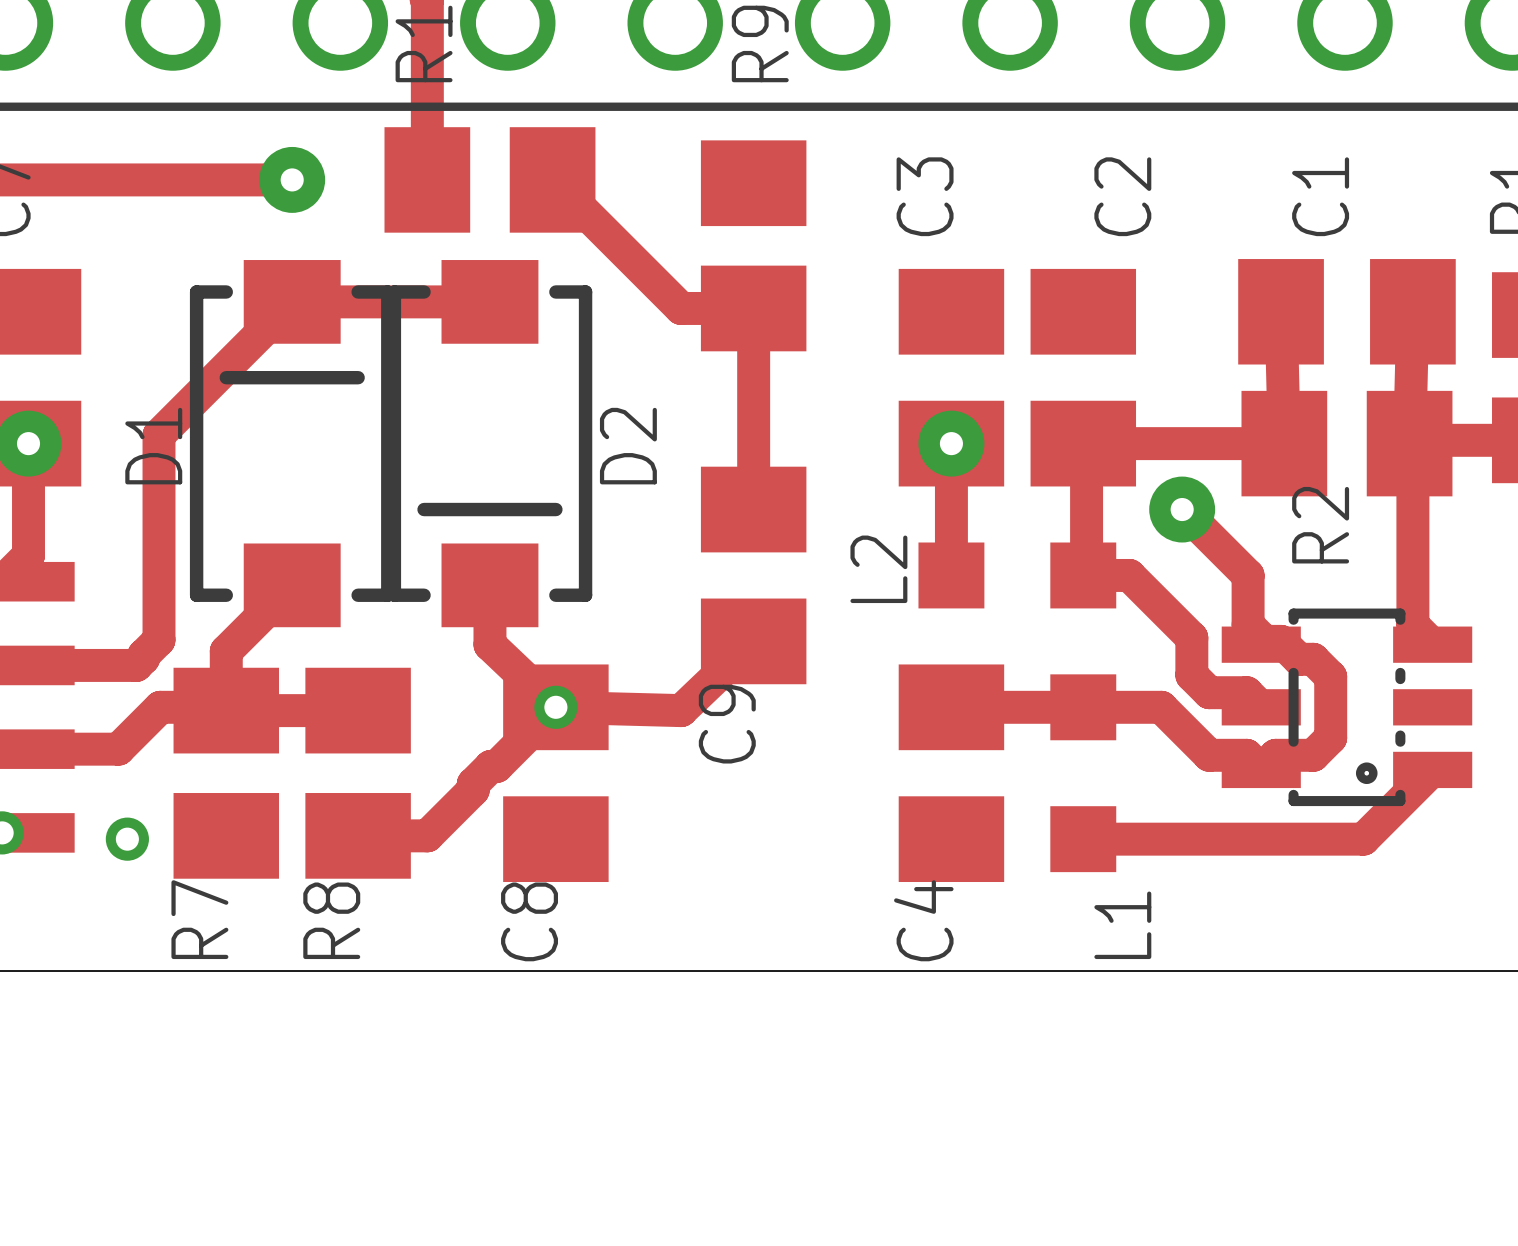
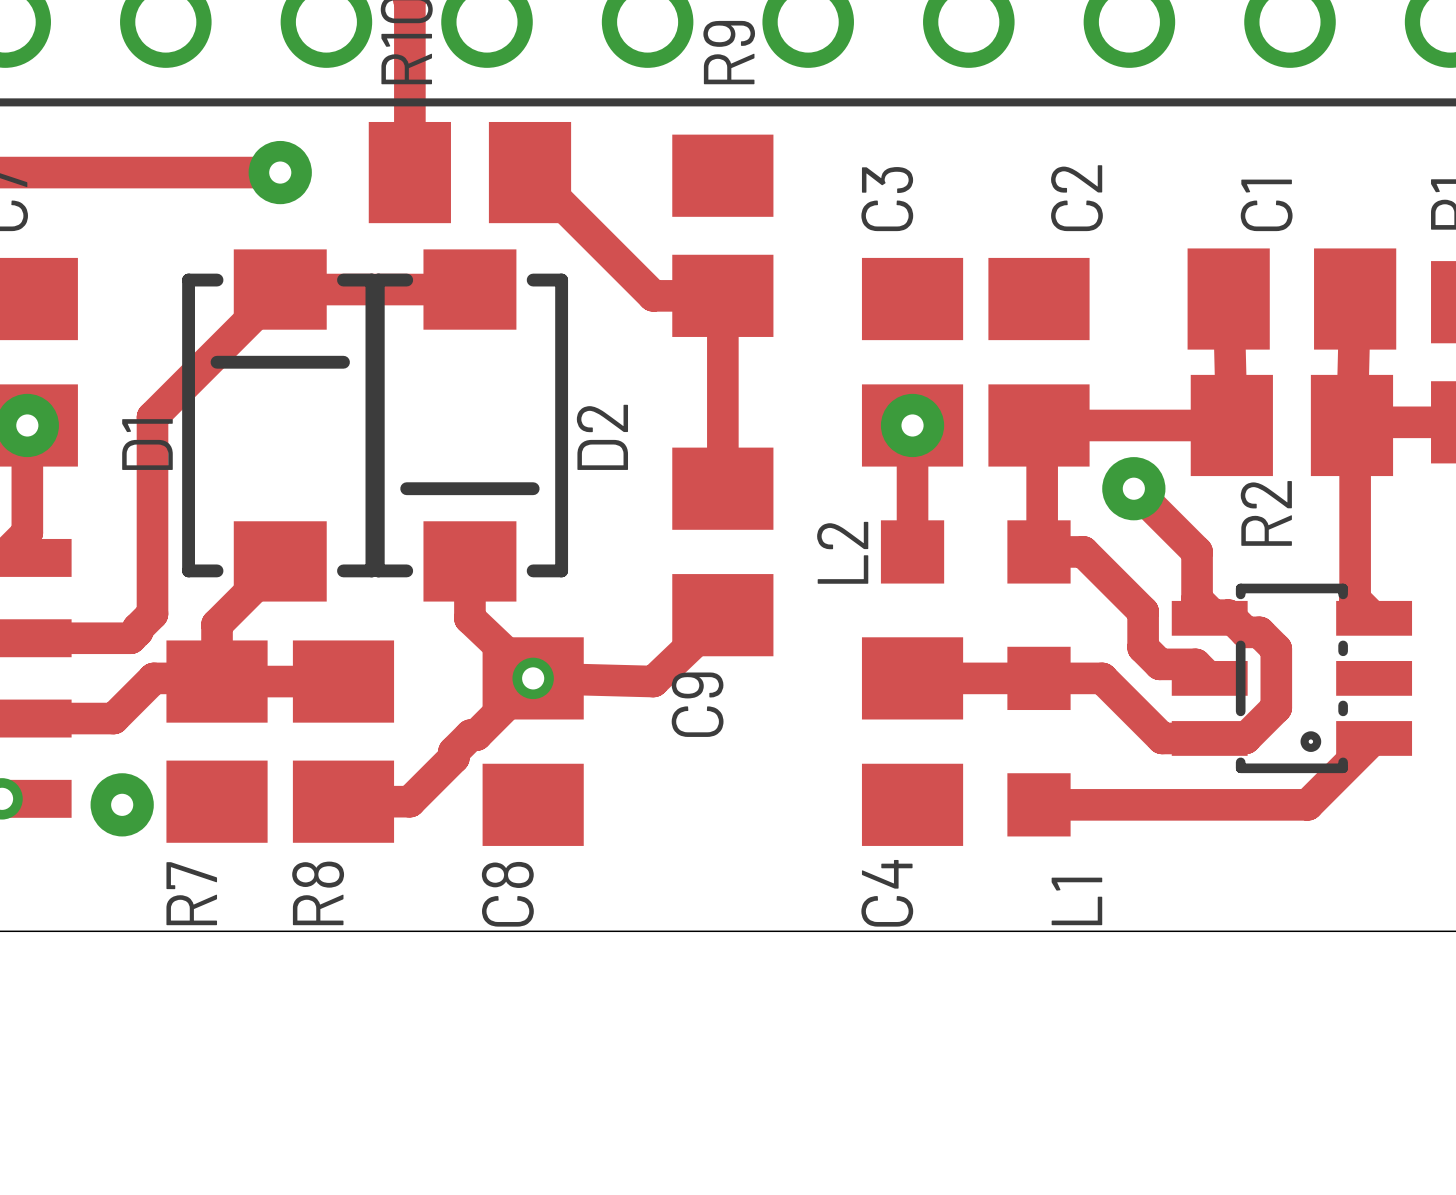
track: (1149, 707) (1161, 707) (1209, 755) (1246, 755) (1261, 769) (1275, 755) (1313, 755) -> (1102, 678) (1162, 738) (1245, 738) (1259, 724)
via size: [105, 817, 149, 861] -> [90, 773, 154, 837]

